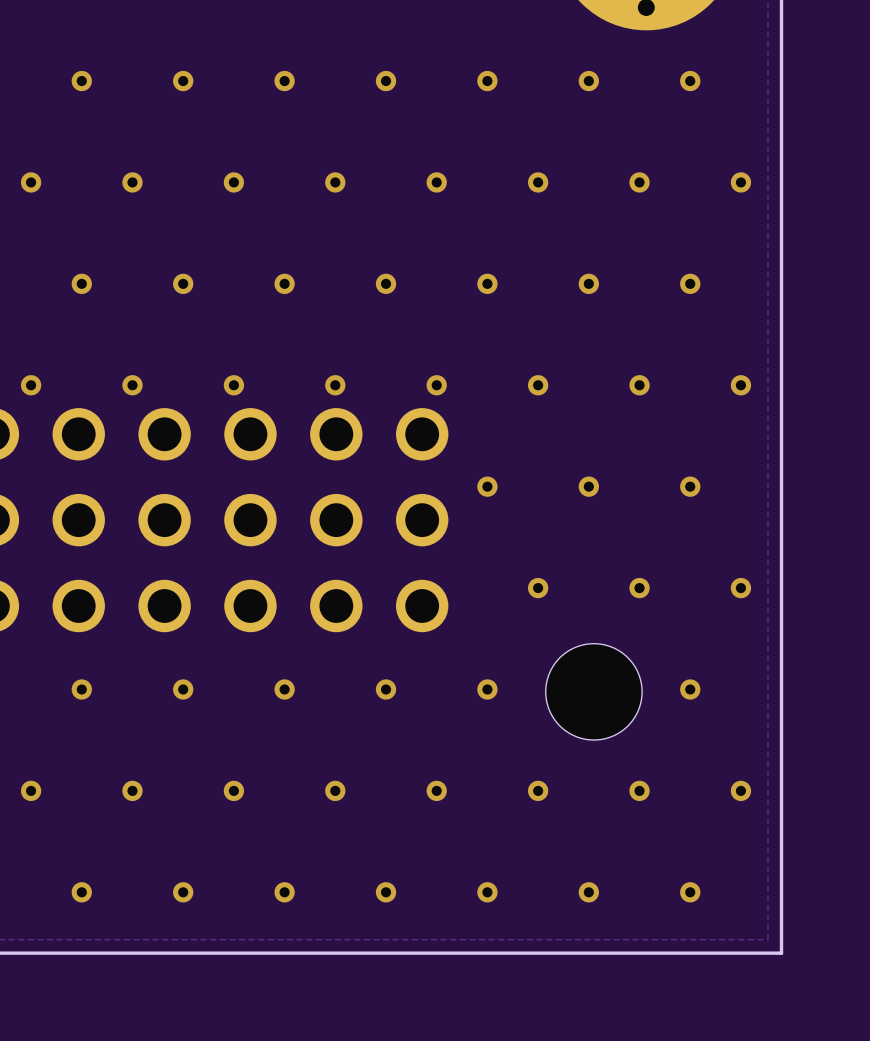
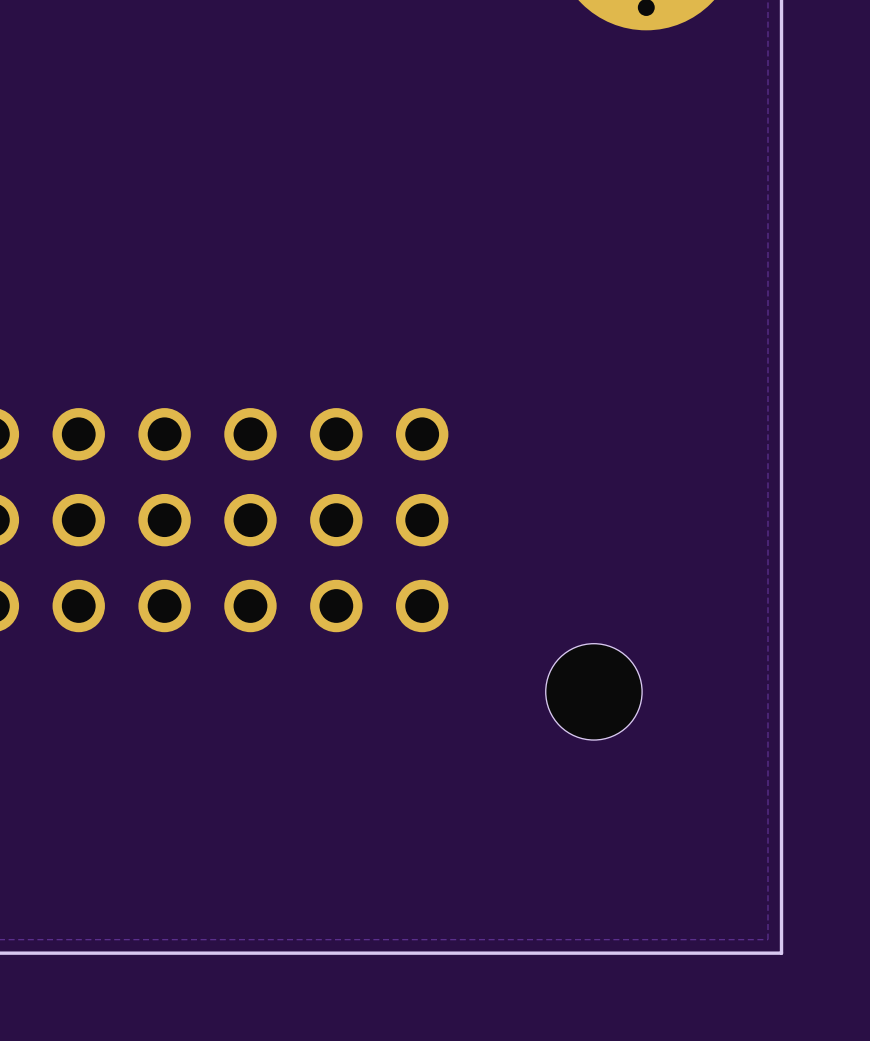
via: (81, 81) -> none
via: (183, 81) -> none
via: (284, 81) -> none
via: (386, 81) -> none
via: (487, 81) -> none
via: (588, 81) -> none
via: (690, 81) -> none
via: (31, 182) -> none
via: (132, 182) -> none
via: (233, 182) -> none
via: (335, 182) -> none
via: (436, 182) -> none
via: (538, 182) -> none
via: (639, 182) -> none
via: (740, 182) -> none
via: (81, 283) -> none
via: (183, 283) -> none
via: (284, 283) -> none
via: (386, 283) -> none
via: (487, 283) -> none
via: (588, 283) -> none
via: (690, 283) -> none
via: (31, 385) -> none
via: (132, 385) -> none
via: (233, 385) -> none
via: (335, 385) -> none
via: (436, 385) -> none
via: (538, 385) -> none
via: (639, 385) -> none
via: (740, 385) -> none
via: (487, 486) -> none
via: (588, 486) -> none
via: (690, 486) -> none
via: (538, 588) -> none
via: (639, 588) -> none
via: (740, 588) -> none
via: (81, 689) -> none
via: (183, 689) -> none
via: (284, 689) -> none
via: (386, 689) -> none
via: (487, 689) -> none
via: (690, 689) -> none
via: (31, 790) -> none
via: (132, 790) -> none
via: (233, 790) -> none
via: (335, 790) -> none
via: (436, 790) -> none
via: (538, 790) -> none
via: (639, 790) -> none
via: (740, 790) -> none
via: (81, 892) -> none
via: (183, 892) -> none
via: (284, 892) -> none
via: (386, 892) -> none
via: (487, 892) -> none
via: (588, 892) -> none
via: (690, 892) -> none

